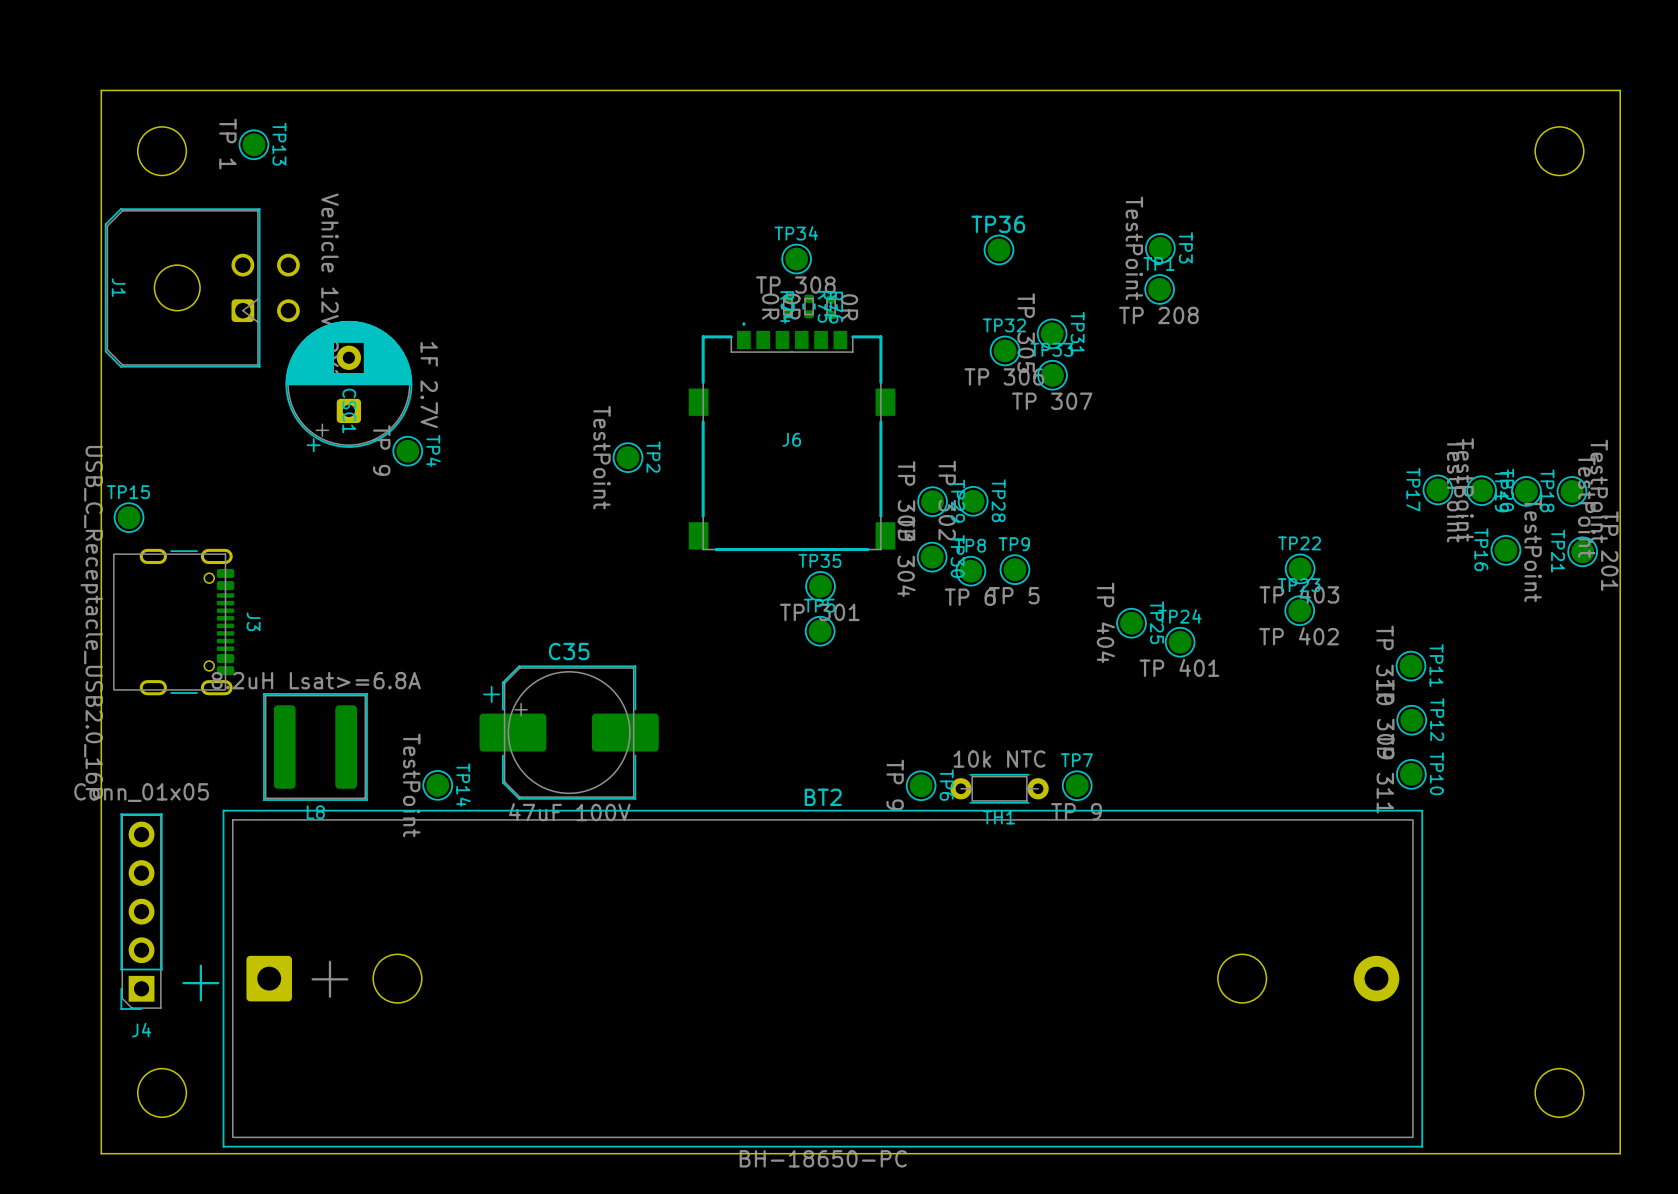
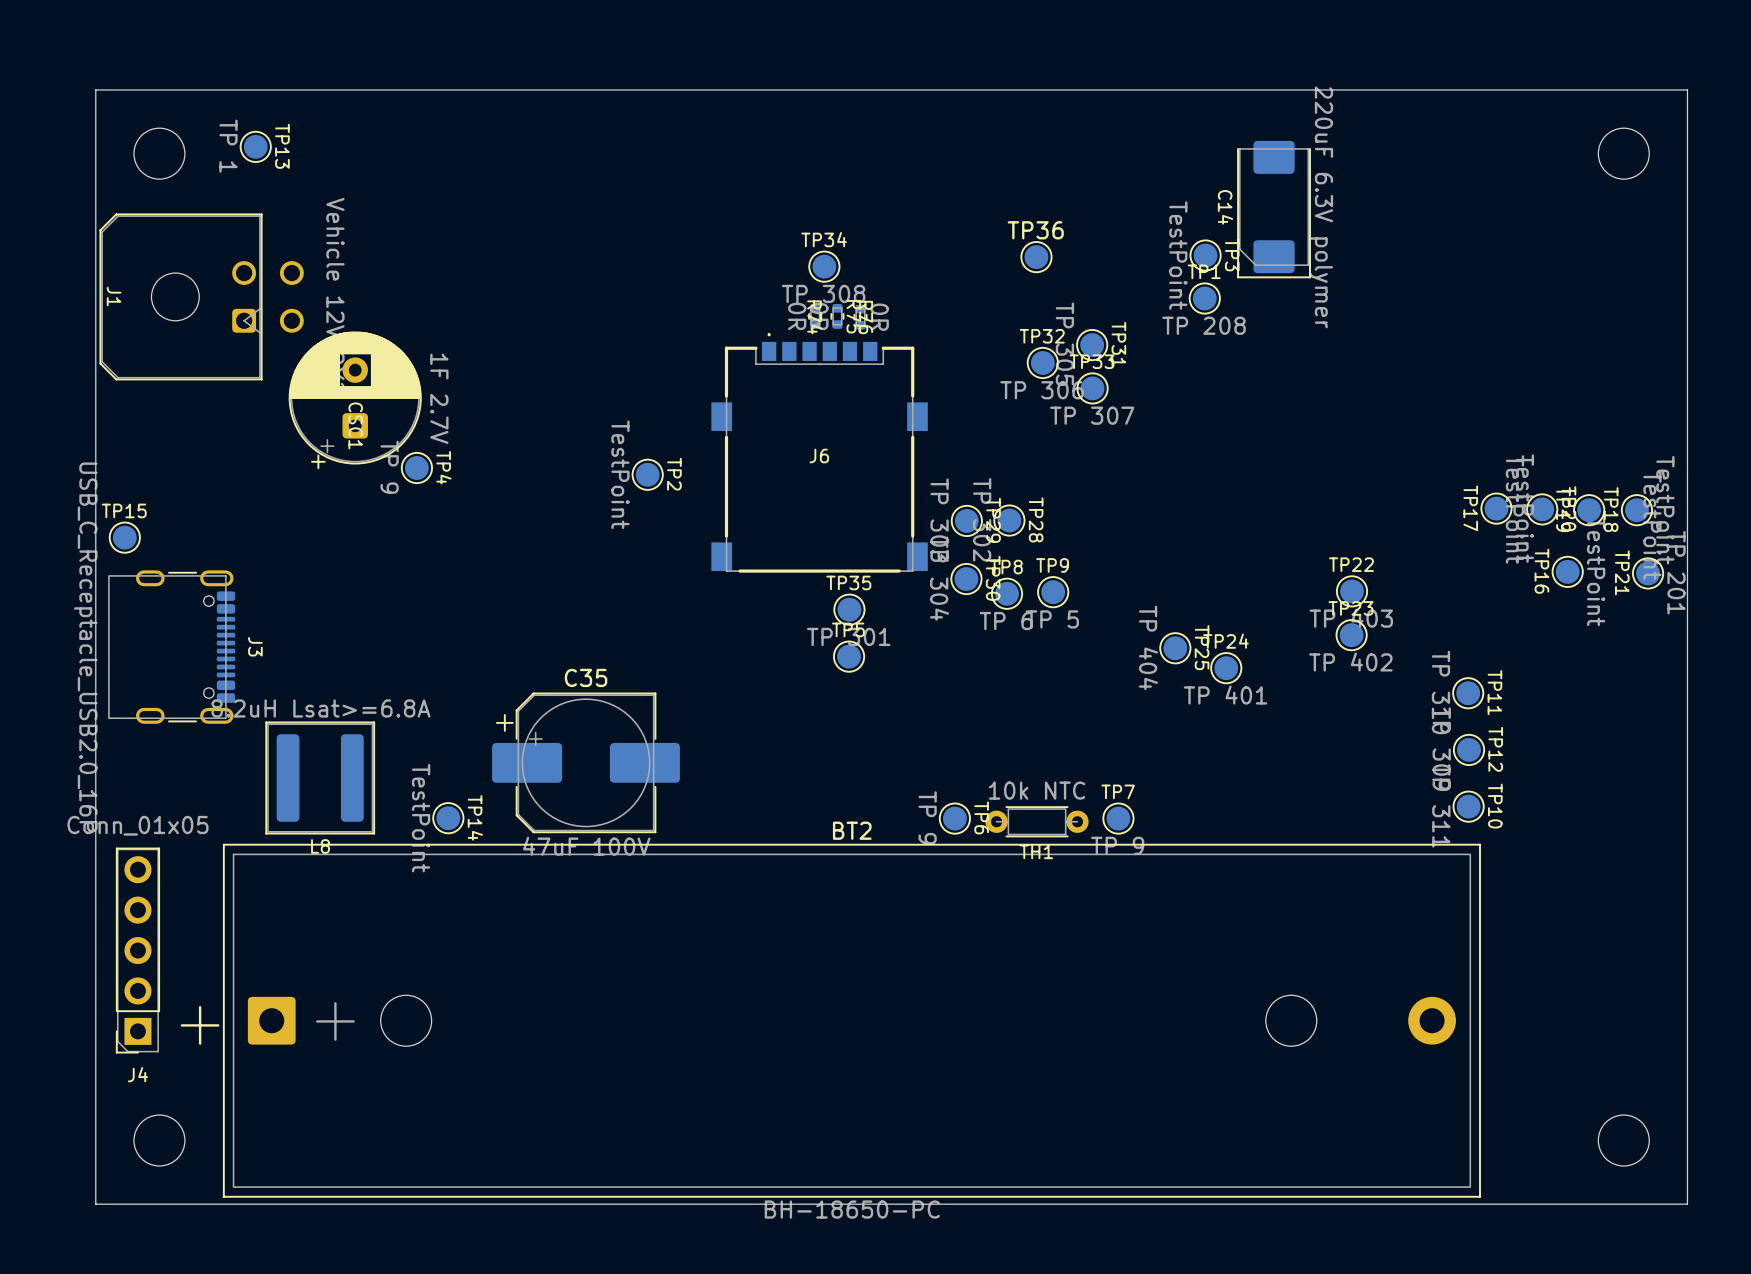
C14: none -> 220uF 6.3V polymer (1274, 209)

